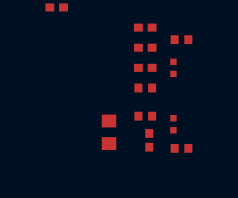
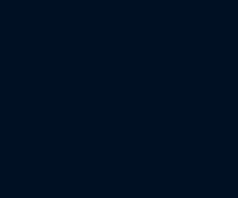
part: (56, 7) -> none
part: (145, 27) -> none
part: (181, 39) -> none
part: (145, 47) -> none
part: (145, 67) -> none
part: (173, 67) -> none
part: (145, 87) -> none
part: (145, 116) -> none
part: (173, 124) -> none
part: (109, 132) -> none
part: (149, 140) -> none
part: (181, 148) -> none

